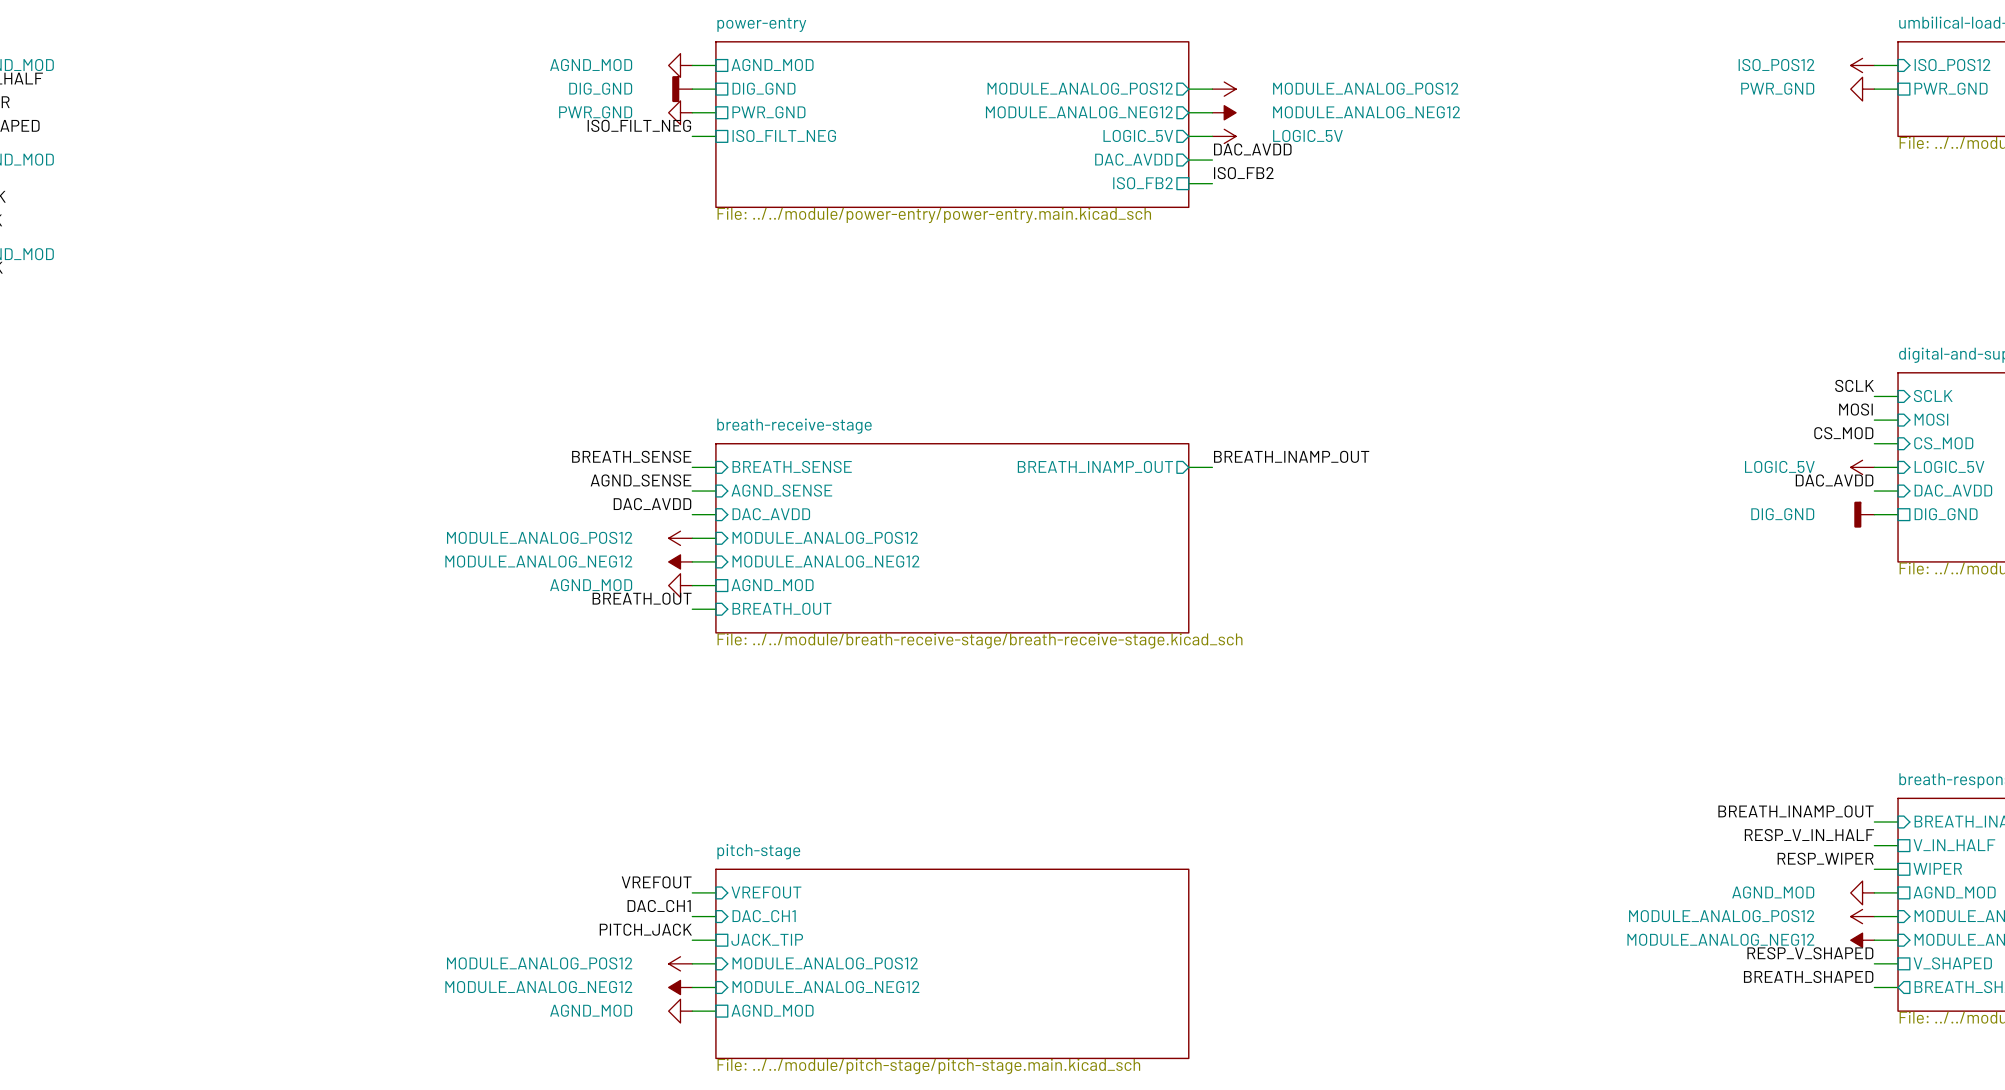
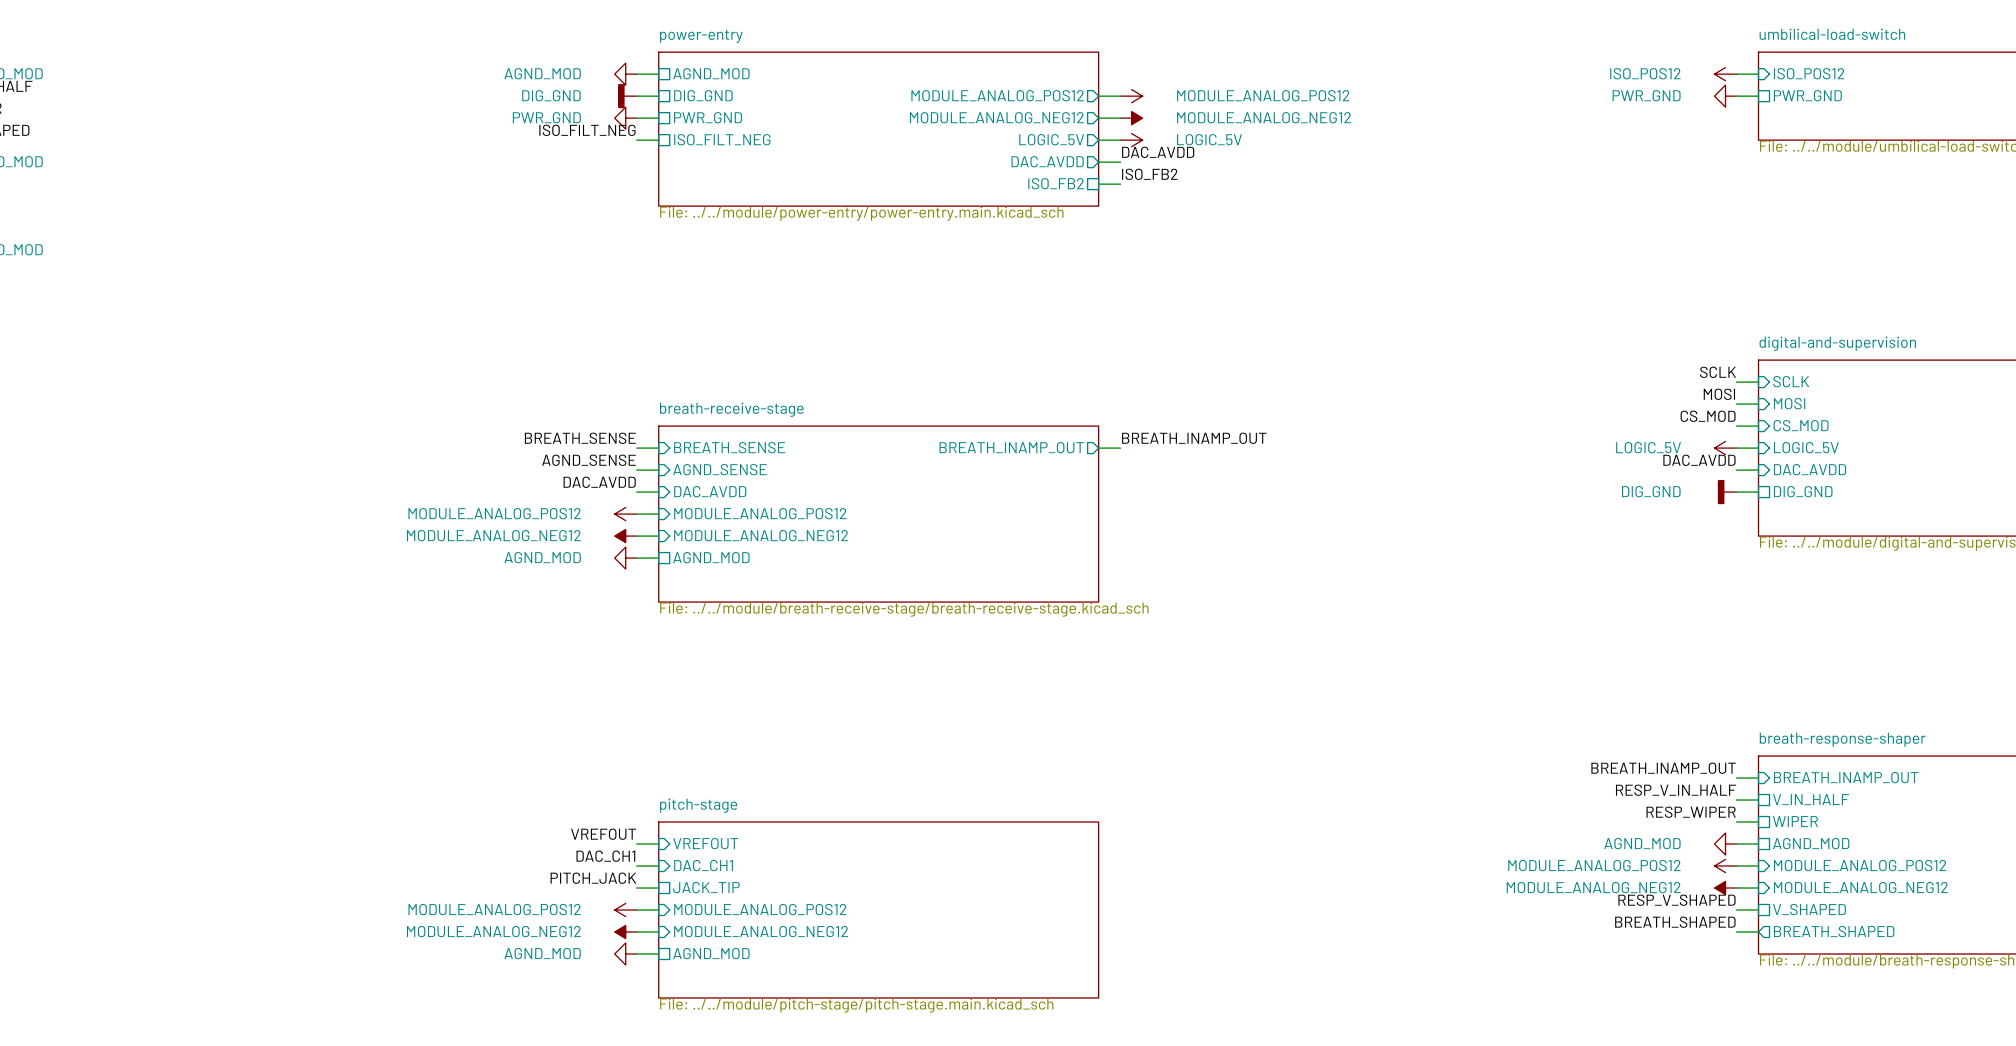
label: BREATH_OUT (642, 598) -> none
sheet pin: BREATH_OUT (782, 608) -> none
wire: (692, 609) (715, 609) -> none

